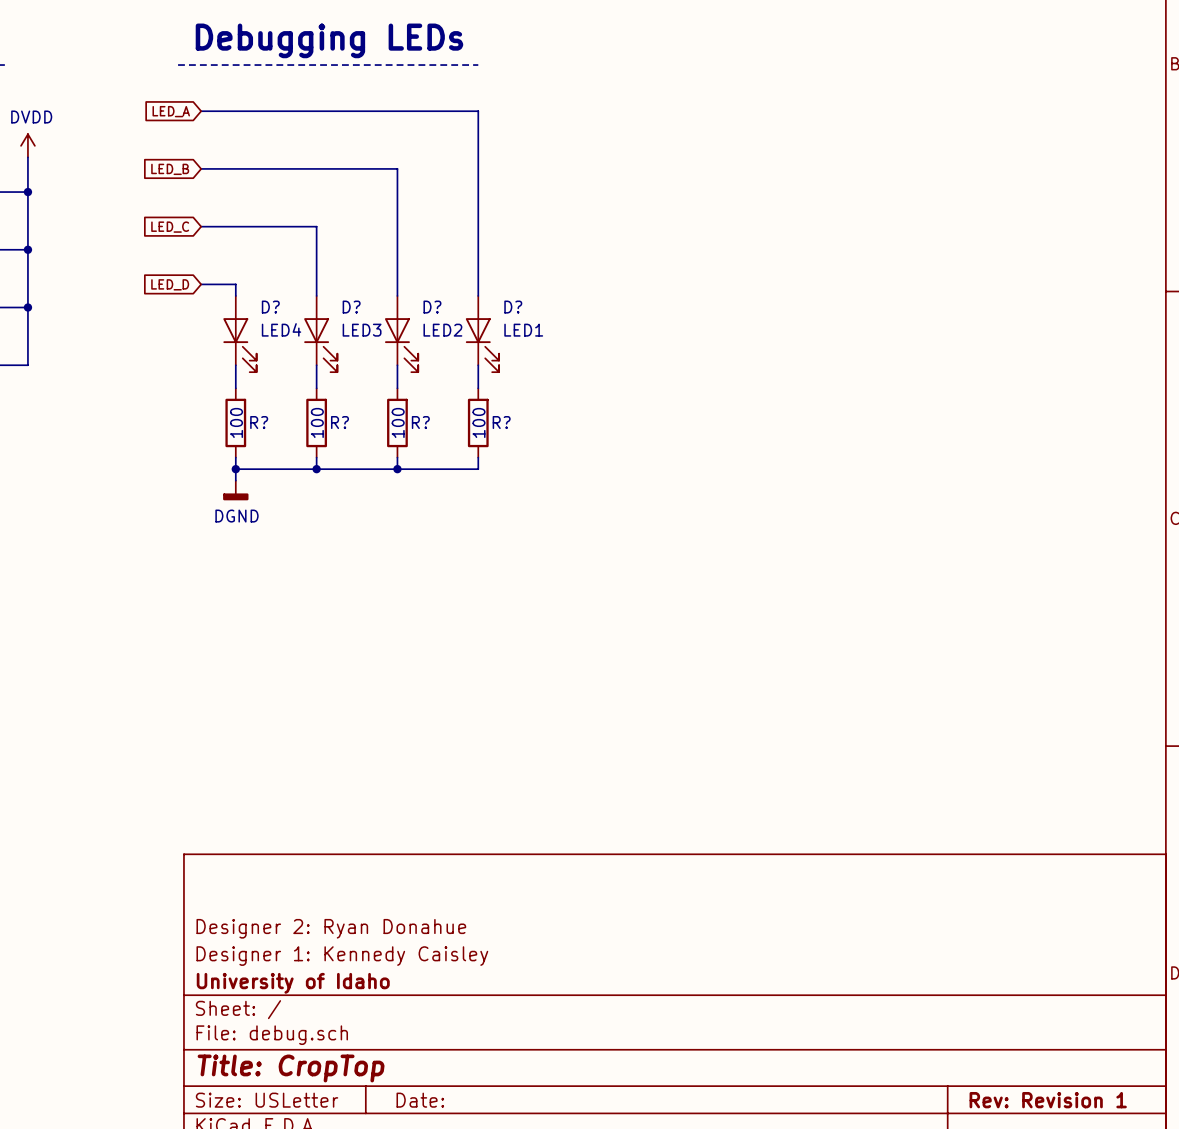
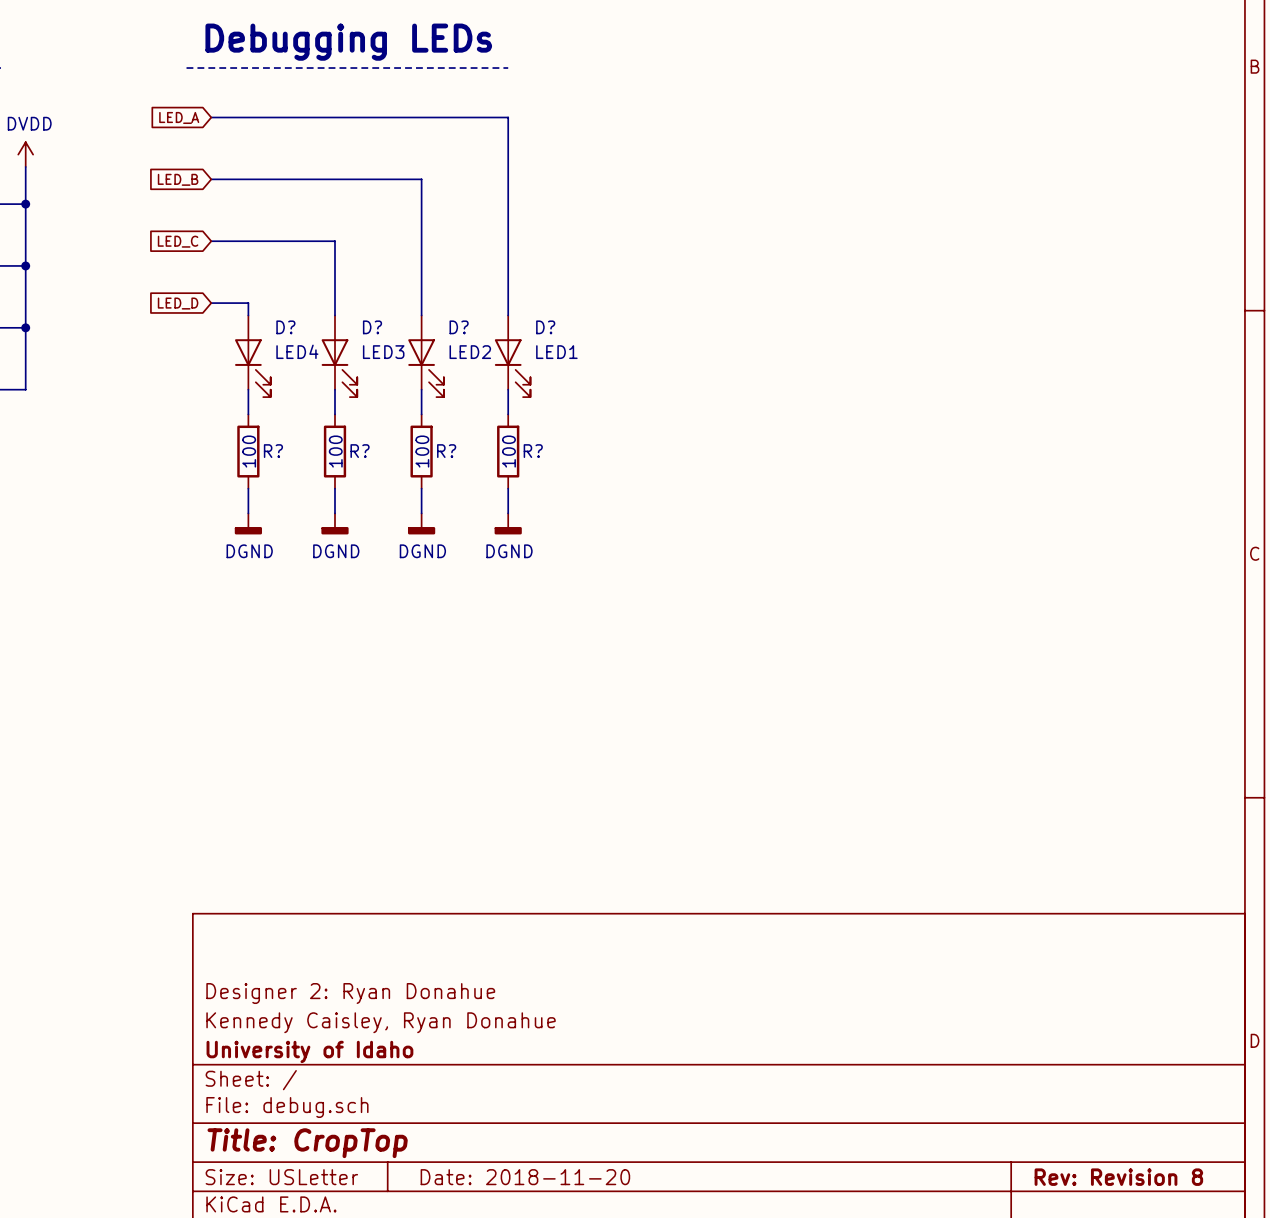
wire: (235, 469) (478, 469) -> (508, 513) (508, 501)
junction: (235, 469) -> none
wire: none -> (334, 501) (334, 513)
junction: (316, 469) -> none
wire: none -> (421, 501) (421, 513)
junction: (397, 469) -> none
power symbol: none -> DGND (334, 523)
power symbol: none -> DGND (421, 523)
power symbol: none -> DGND (508, 523)
title block: Designer 1: Kennedy Caisley (342, 956) -> Kennedy Caisley, Ryan Donahue (381, 1022)
title block: Date: (420, 1100) -> Date: 2018-11-20 (525, 1177)
title block: Rev: Revision 1 (1048, 1100) -> Rev: Revision 8 (1118, 1177)

